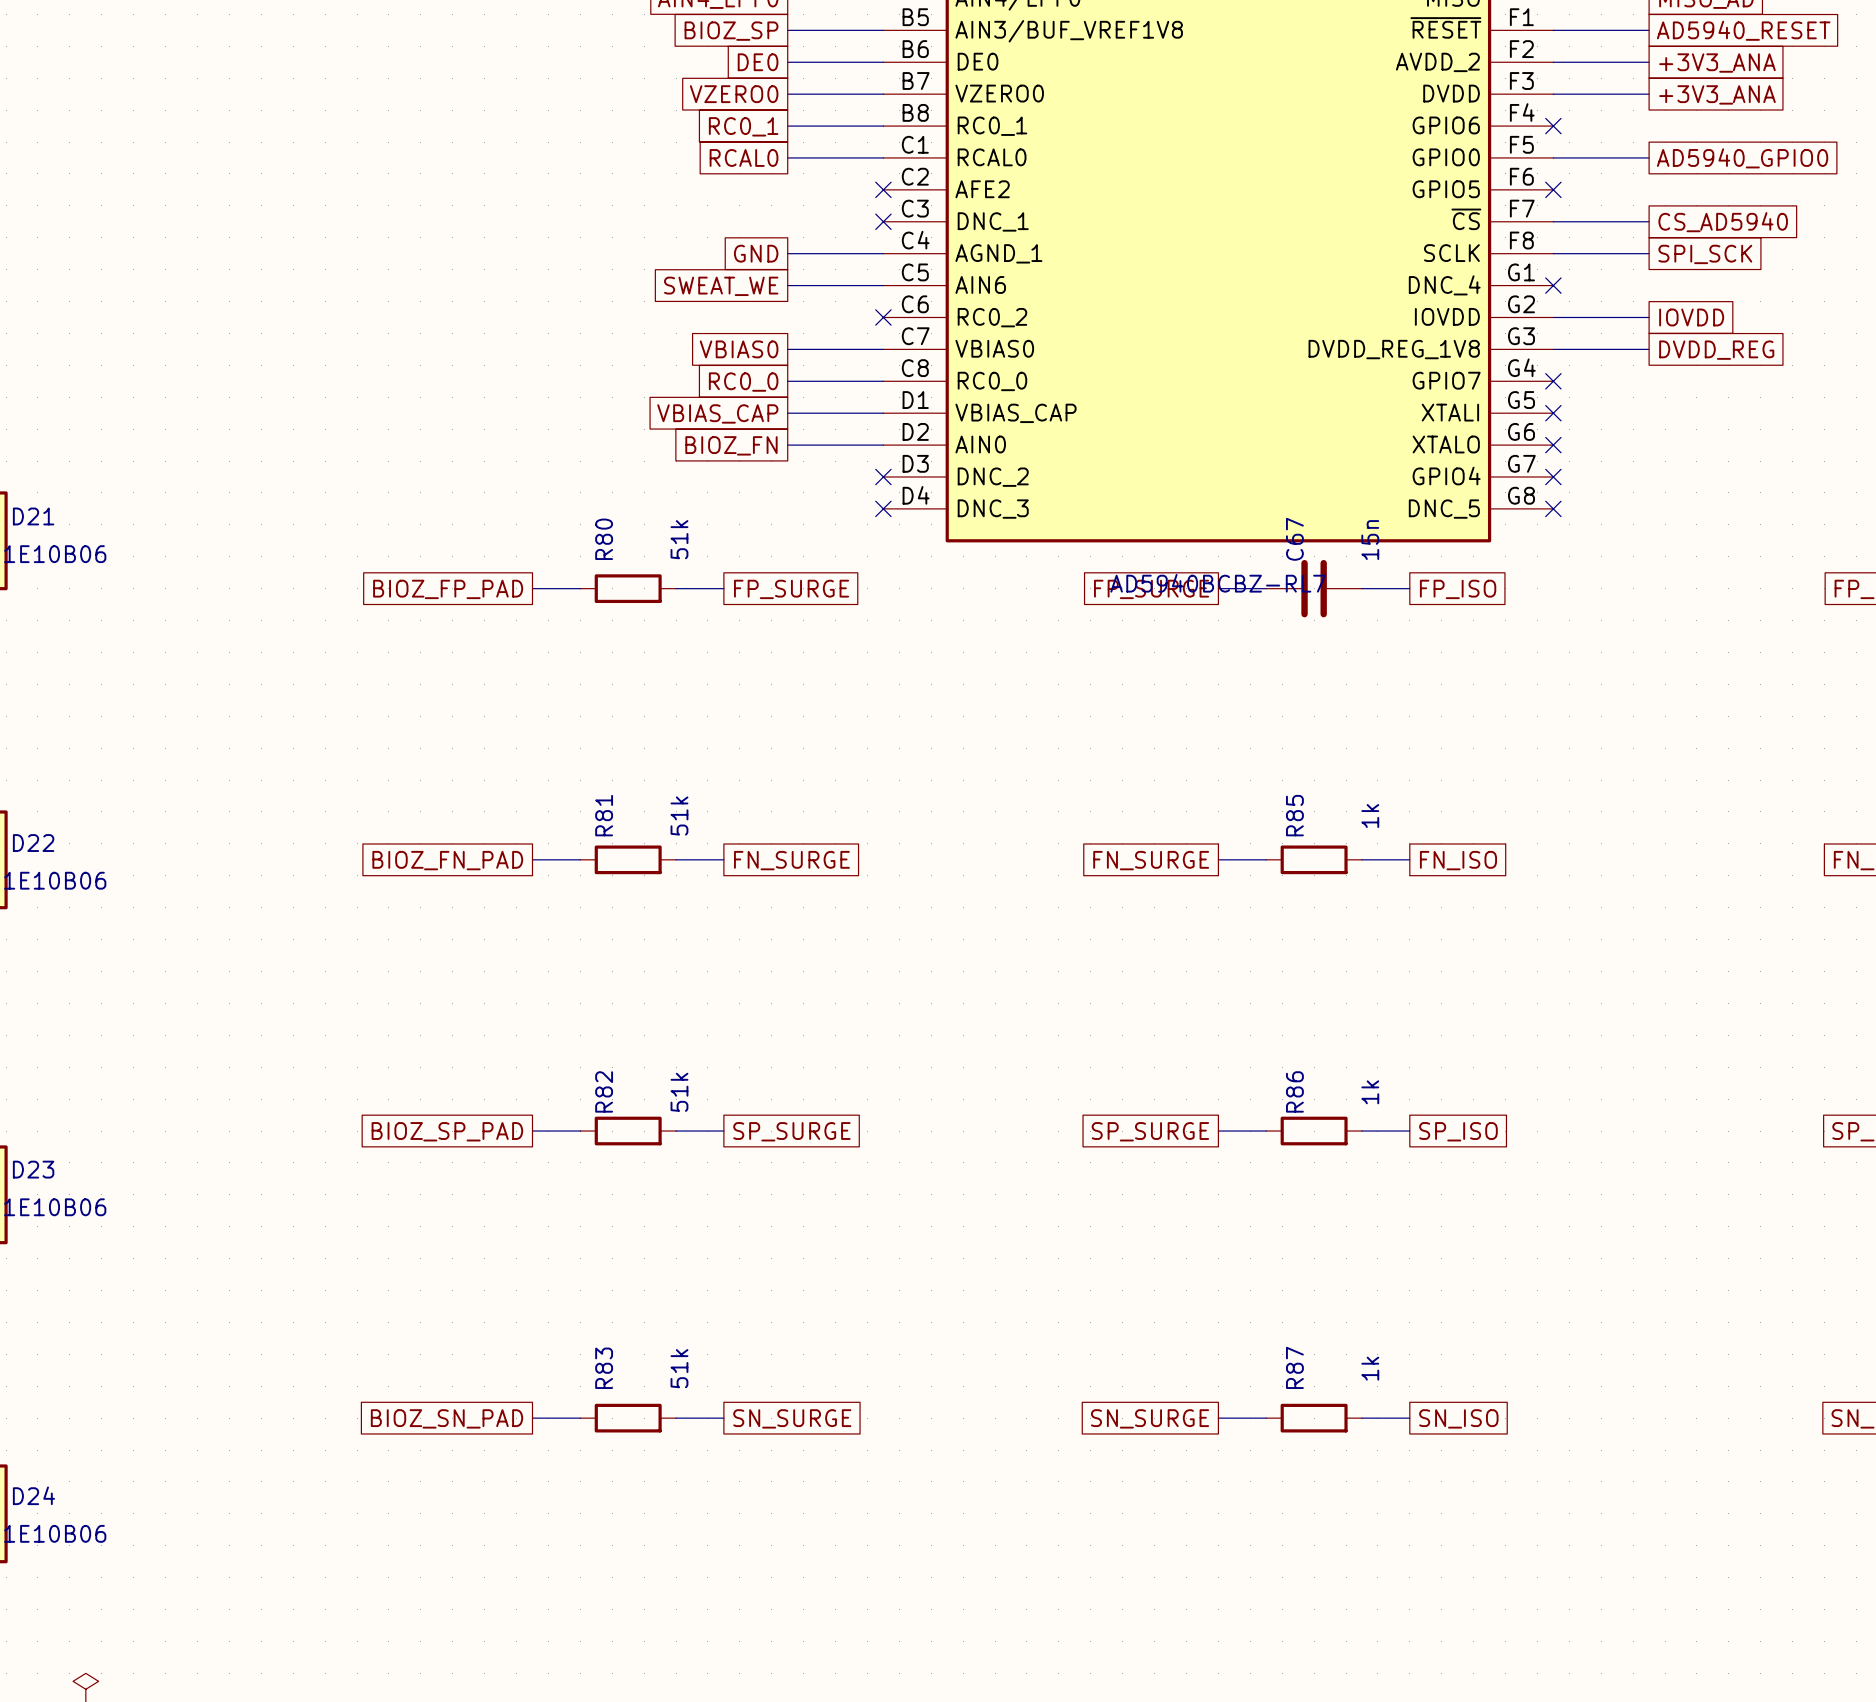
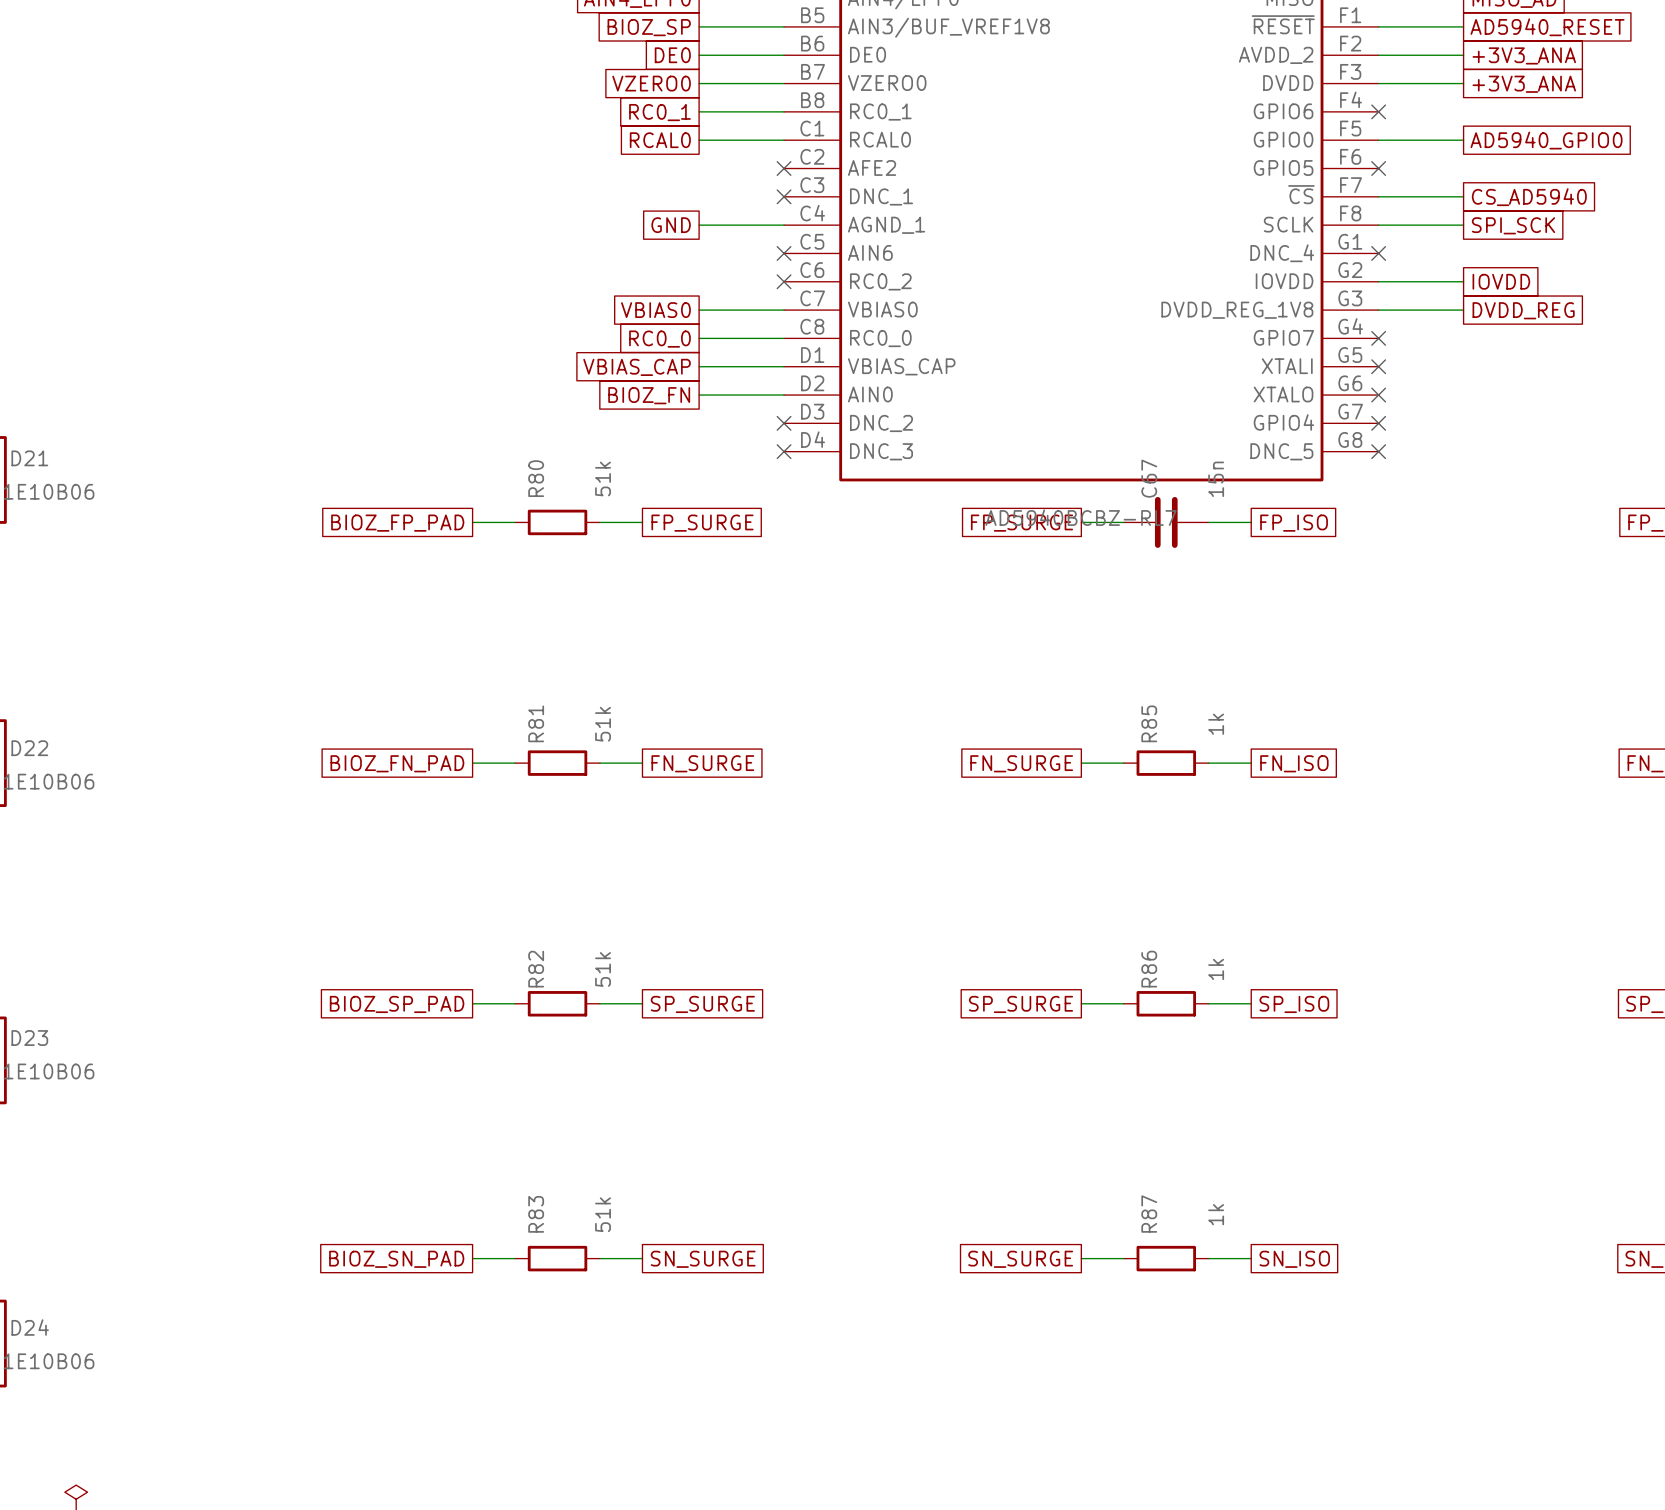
wire: (787, 285) (883, 285) -> none
no-connect mark: none -> (784, 253)
global label: SWEAT_WE (721, 286) -> none

